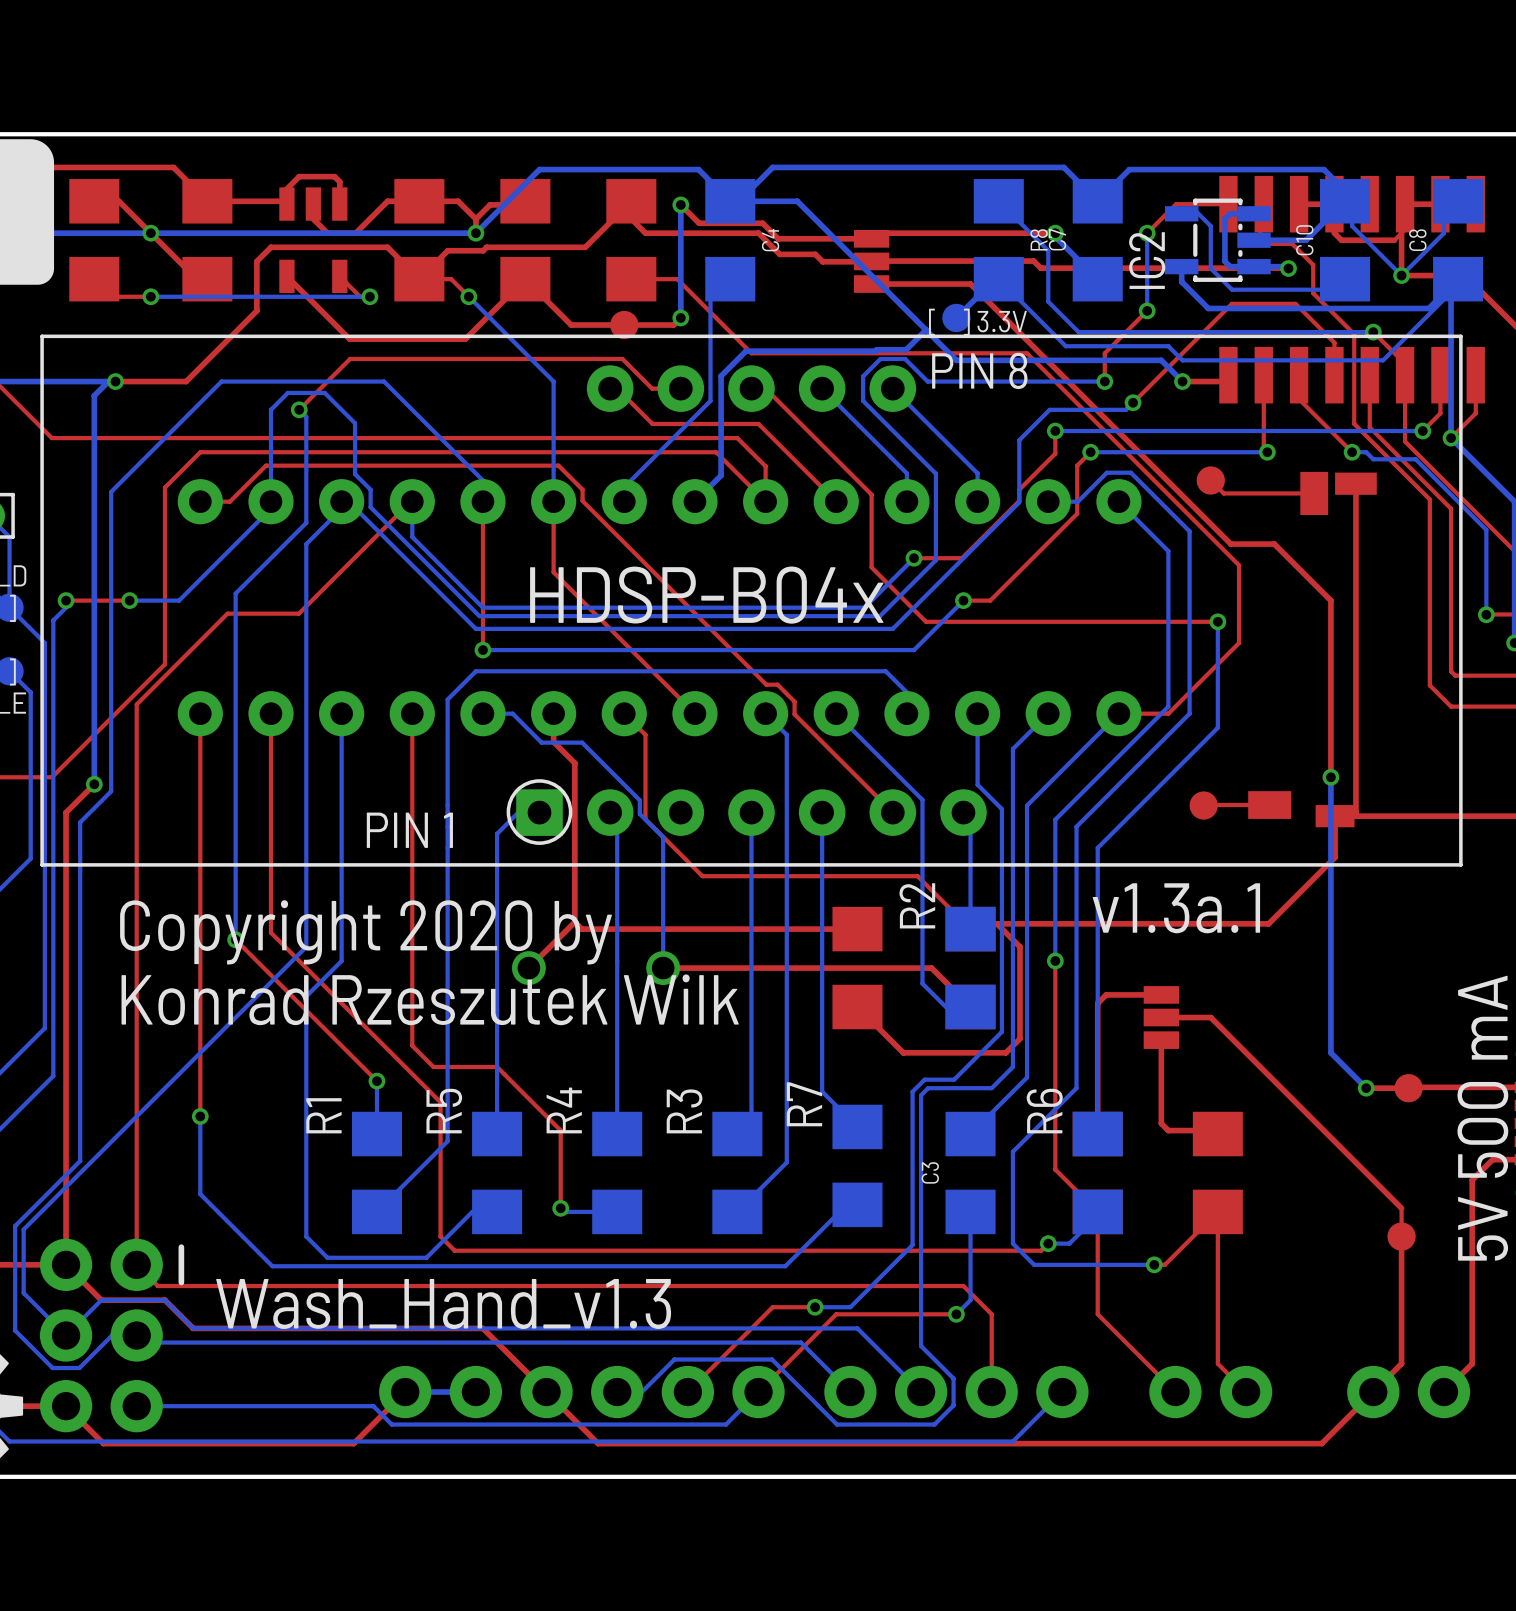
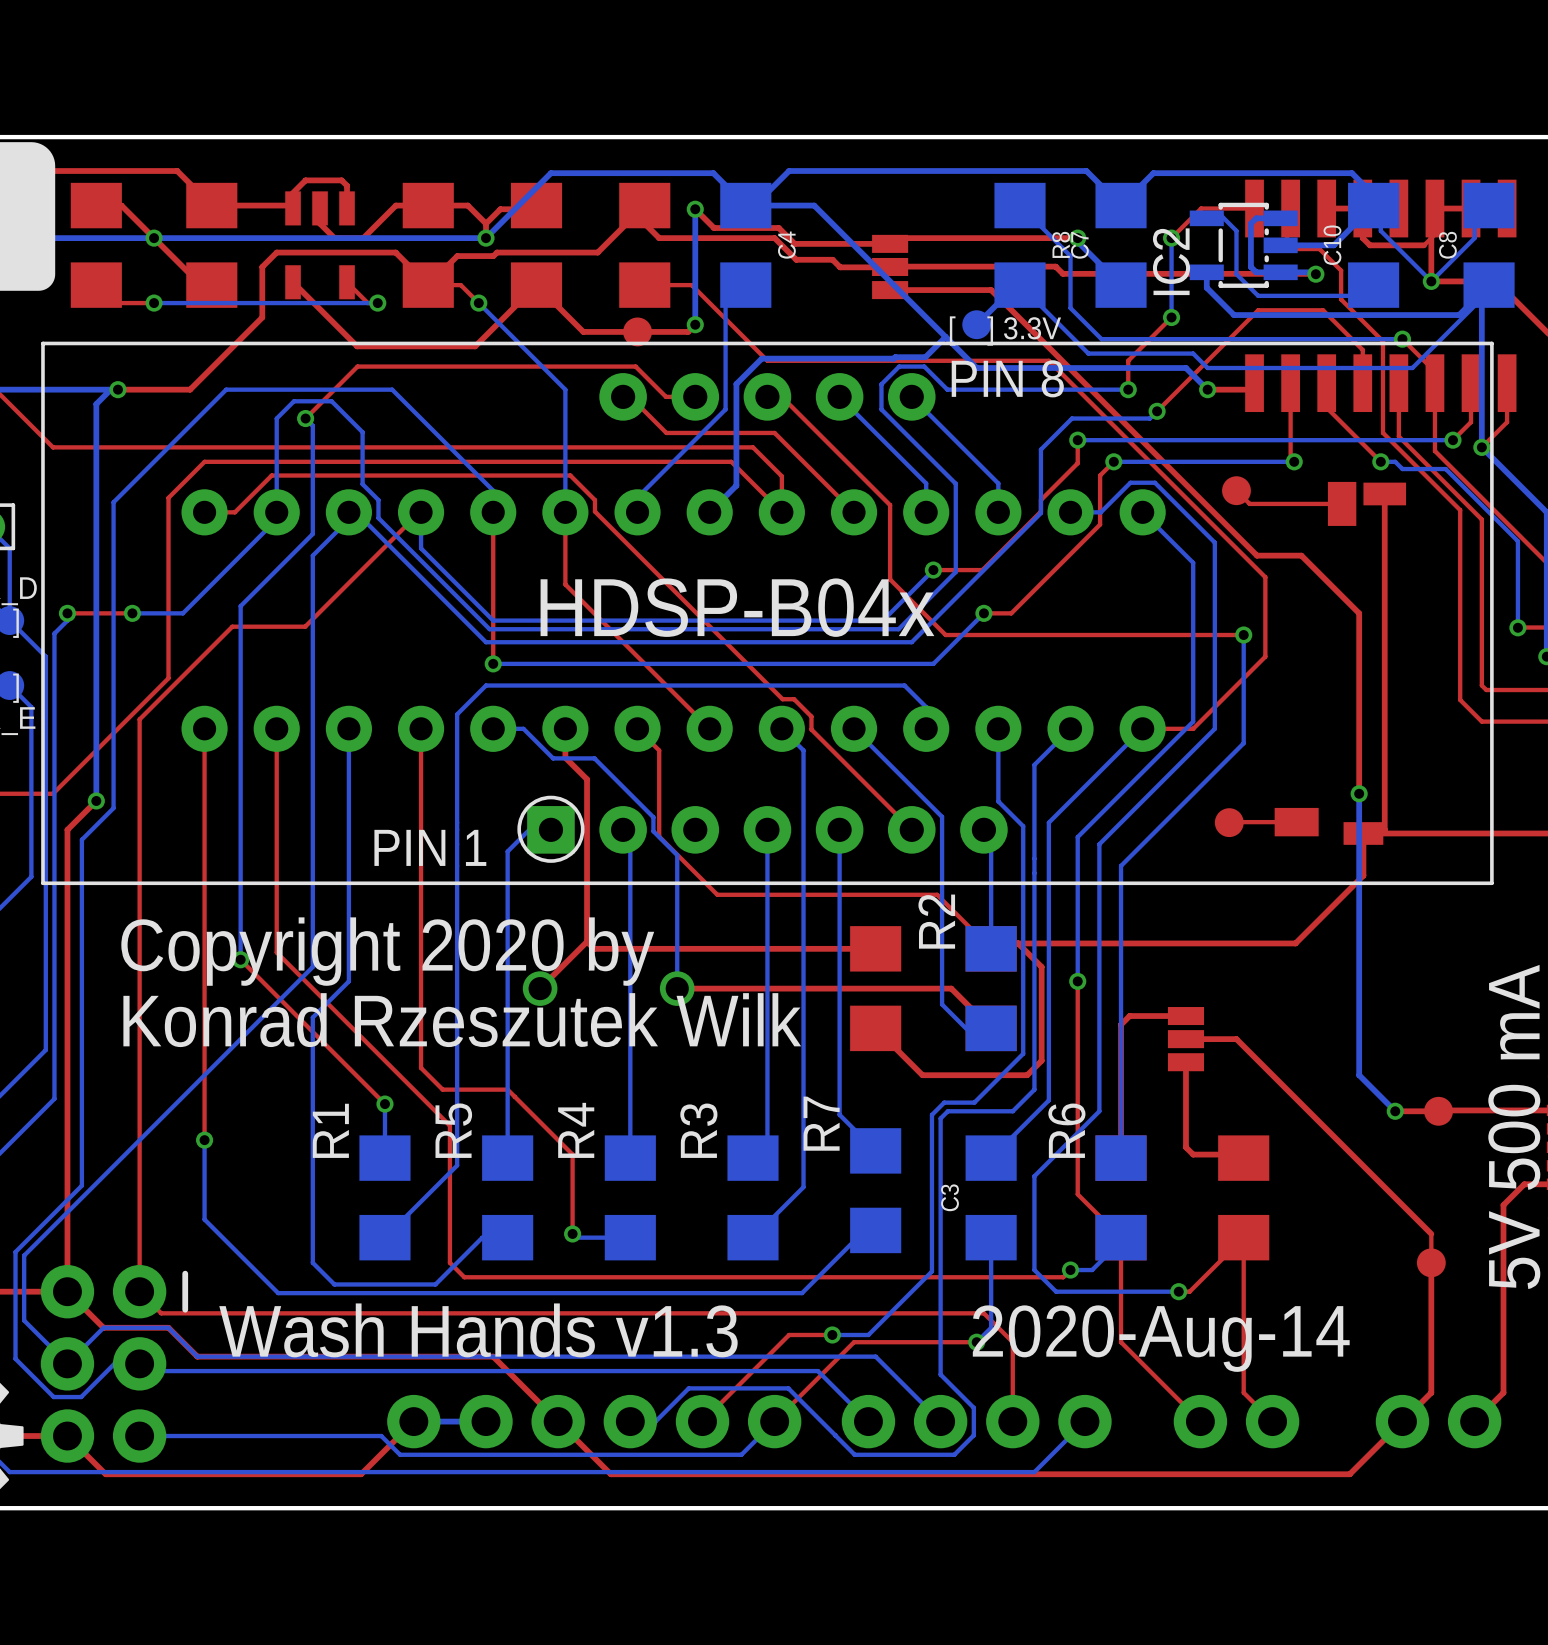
text: v1.3a.1 (1176, 908) -> none
text: Wash_Hand_v1.3 (443, 1303) -> Wash Hands v1.3 (478, 1330)
text: none -> 2020-Aug-14 (1161, 1338)

